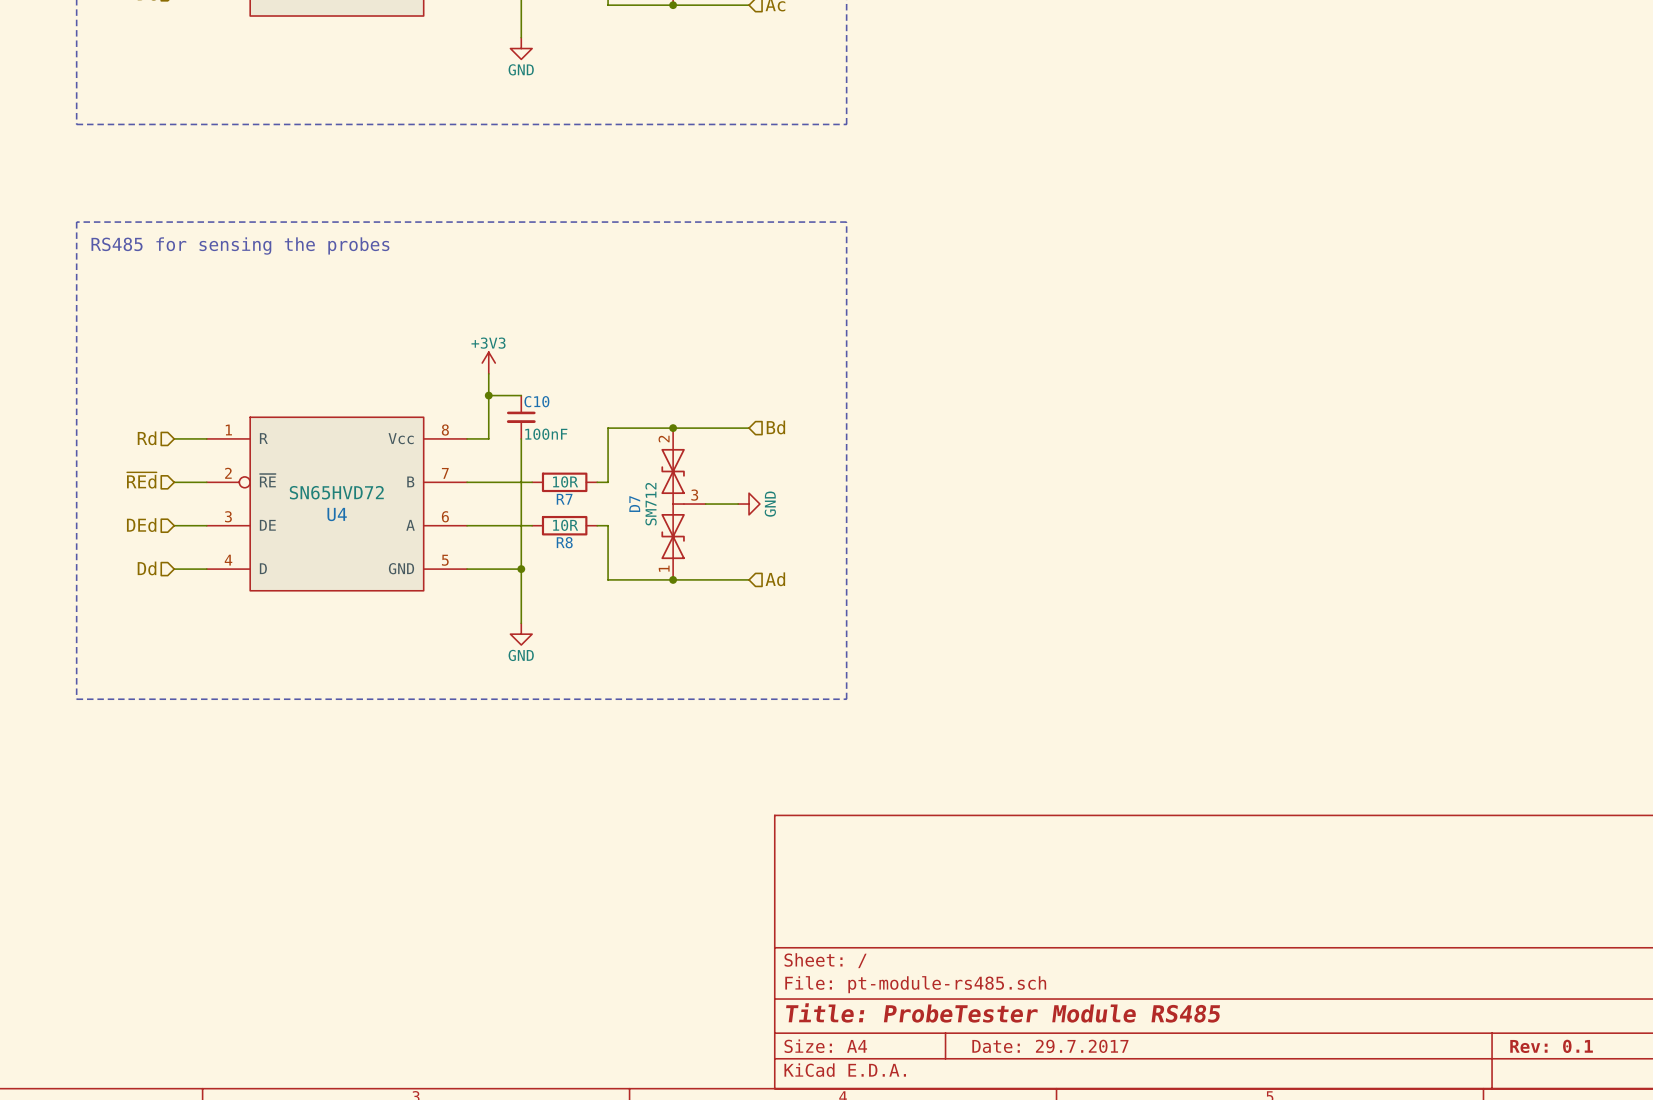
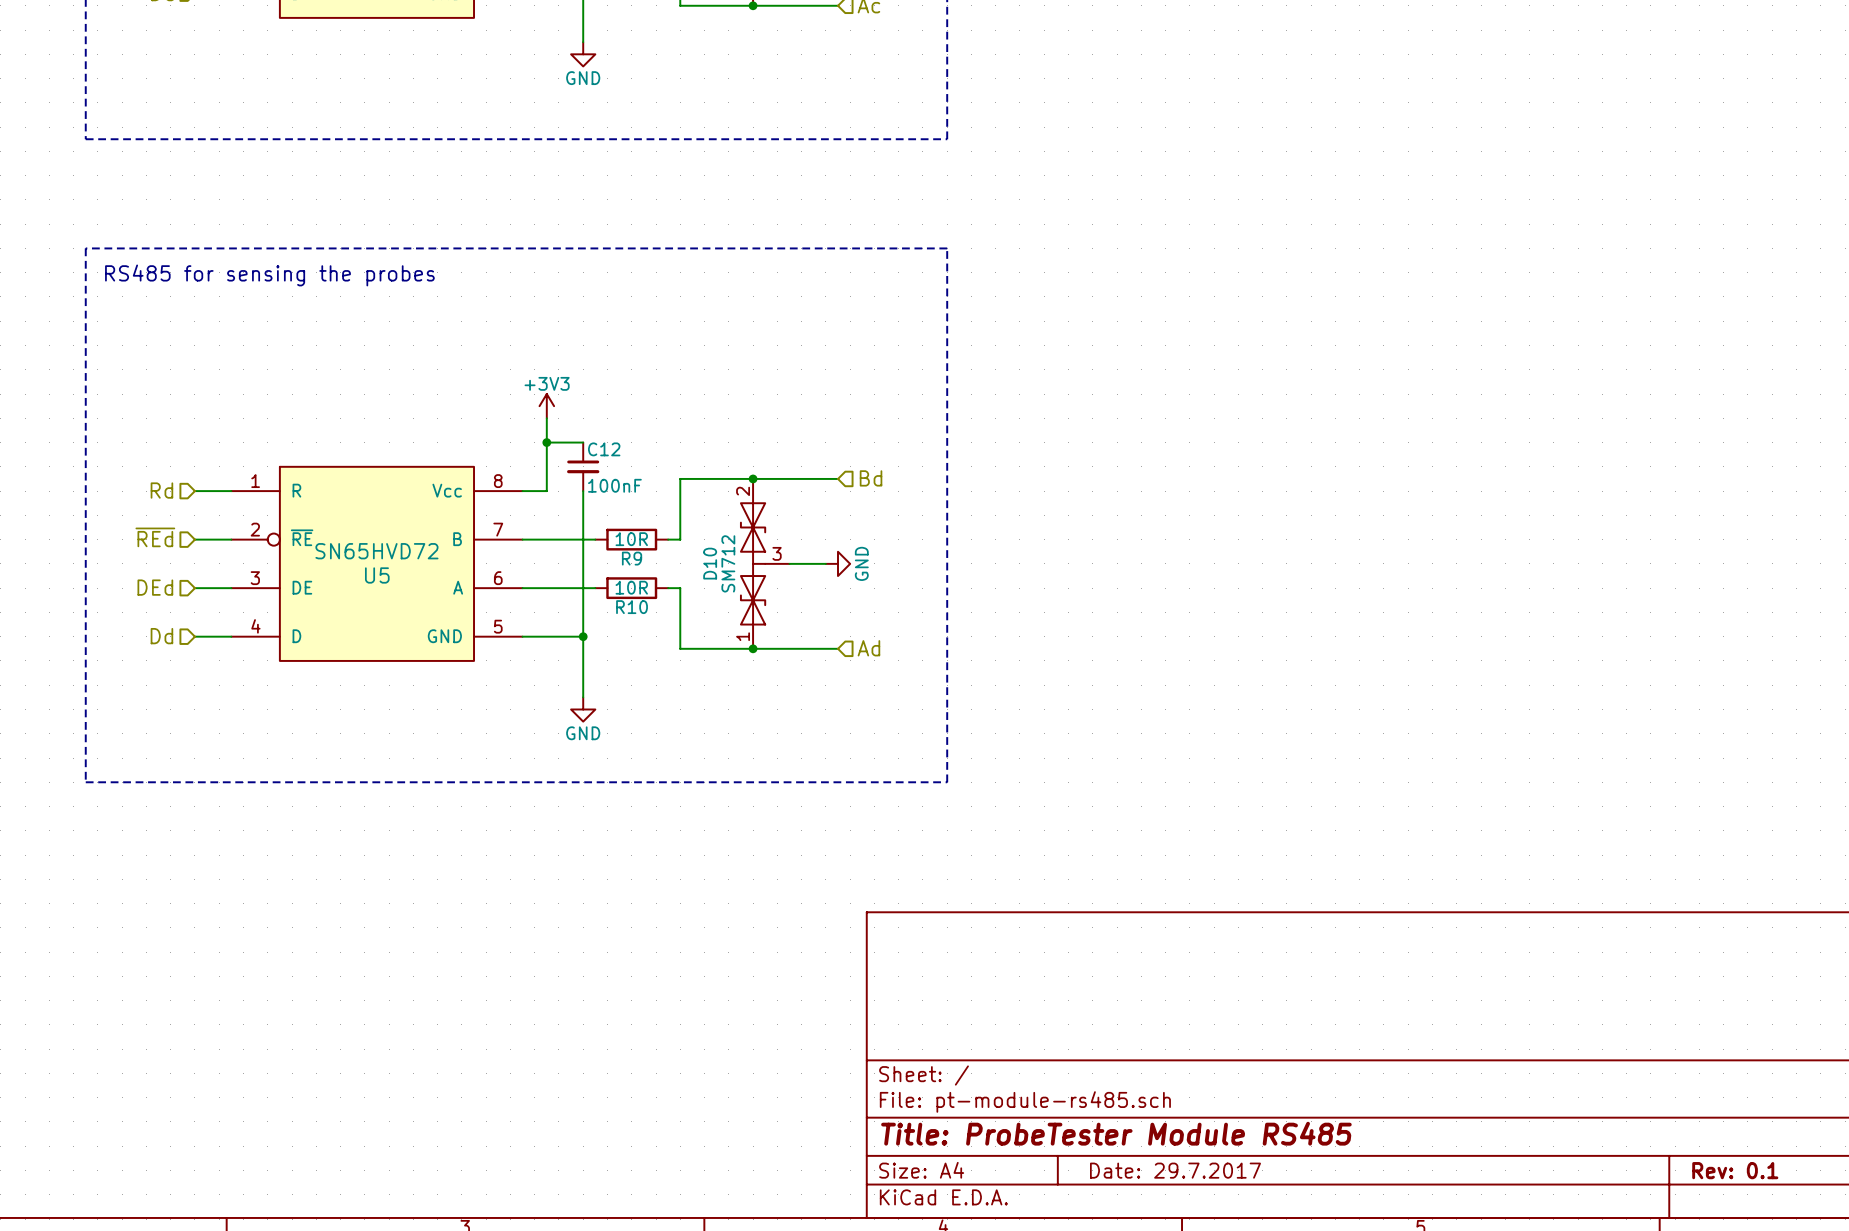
C10 name: C10 (536, 401) -> C12 (604, 449)
R7 name: R7 (564, 499) -> R9 (632, 558)
D7 name: D7 (634, 504) -> D10 (710, 563)
U4 name: U4 (337, 514) -> U5 (377, 575)
R8 name: R8 (564, 542) -> R10 (632, 607)

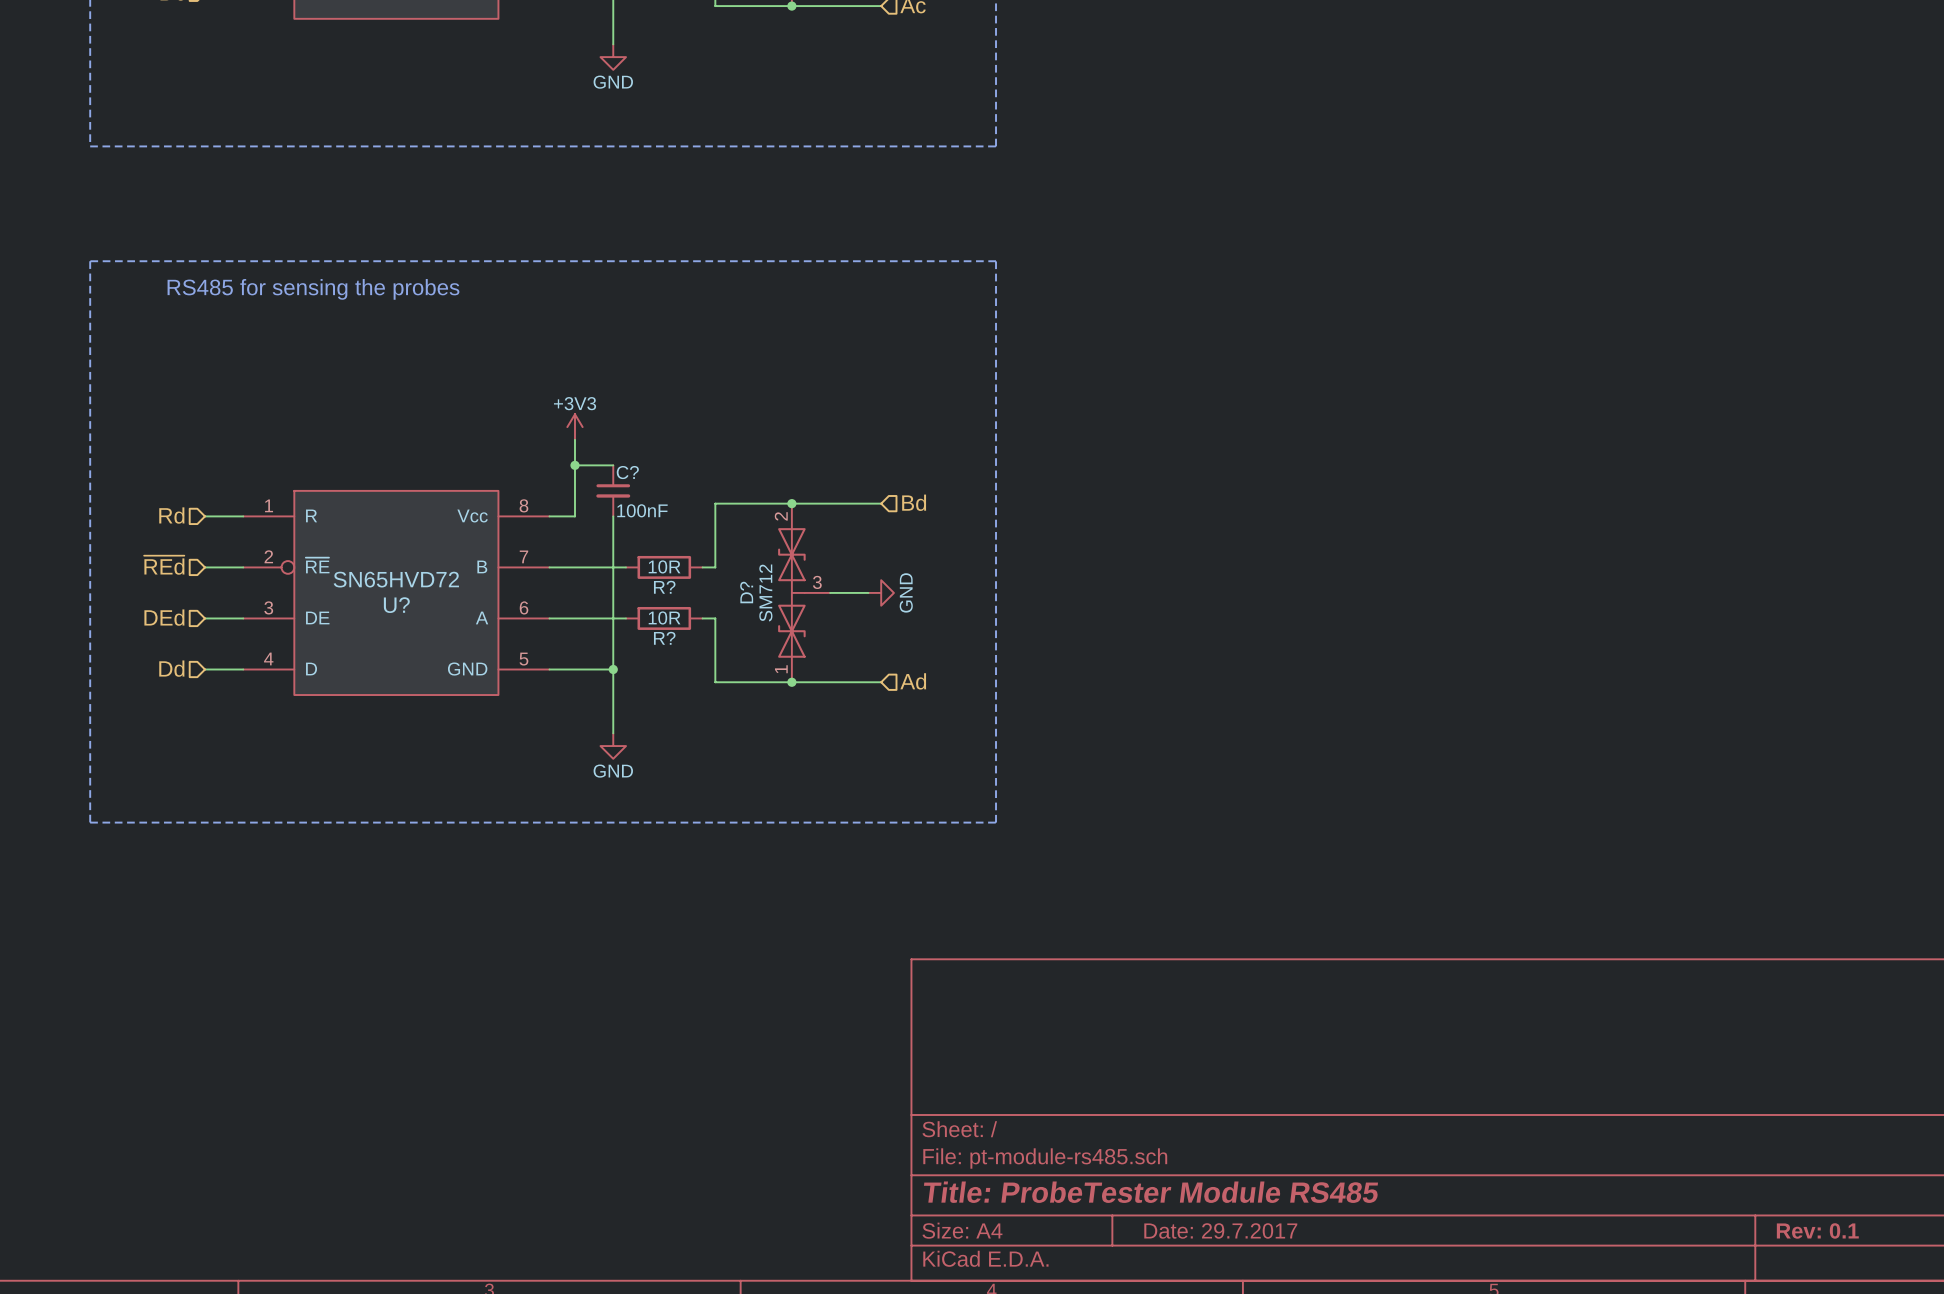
C12 name: C12 (604, 449) -> C? (627, 472)
R9 name: R9 (632, 558) -> R? (664, 587)
D10 name: D10 (710, 563) -> D? (746, 592)
U5 name: U5 (377, 575) -> U? (396, 605)
R10 name: R10 (632, 607) -> R? (664, 638)

